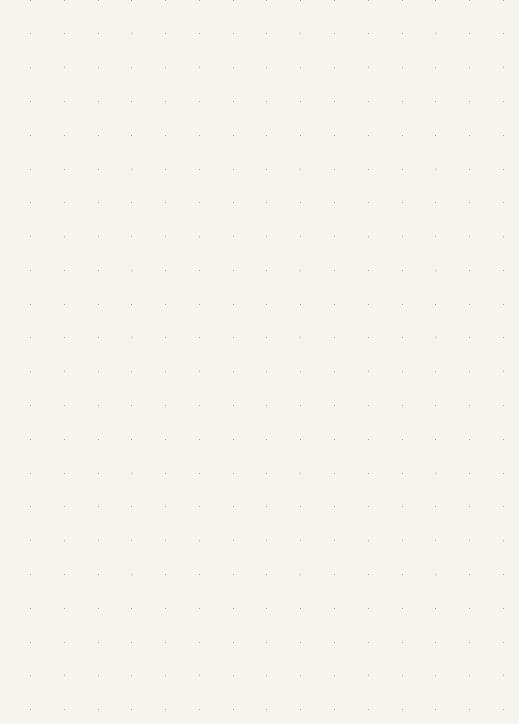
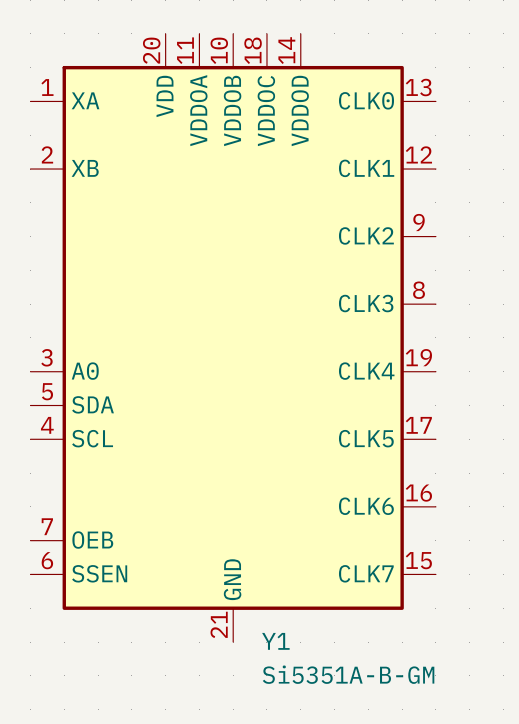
Y1: none -> Si5351A-B-GM (233, 337)

